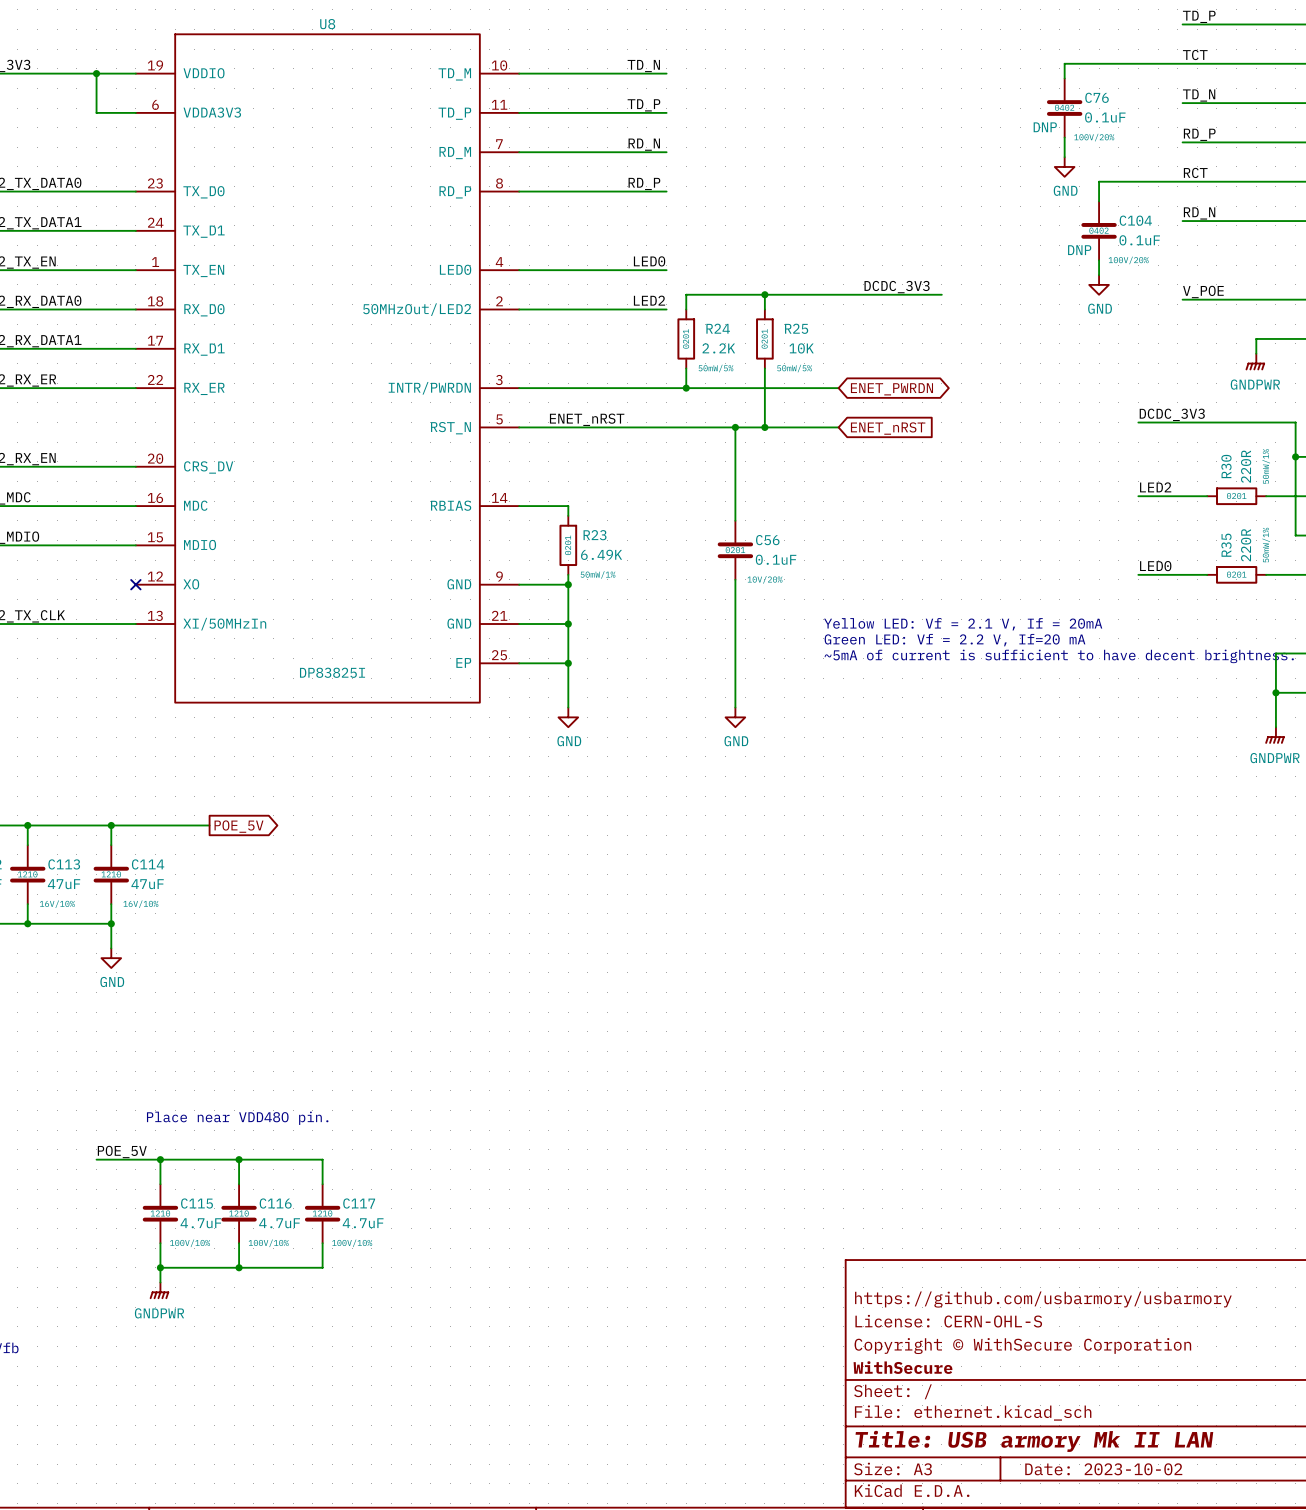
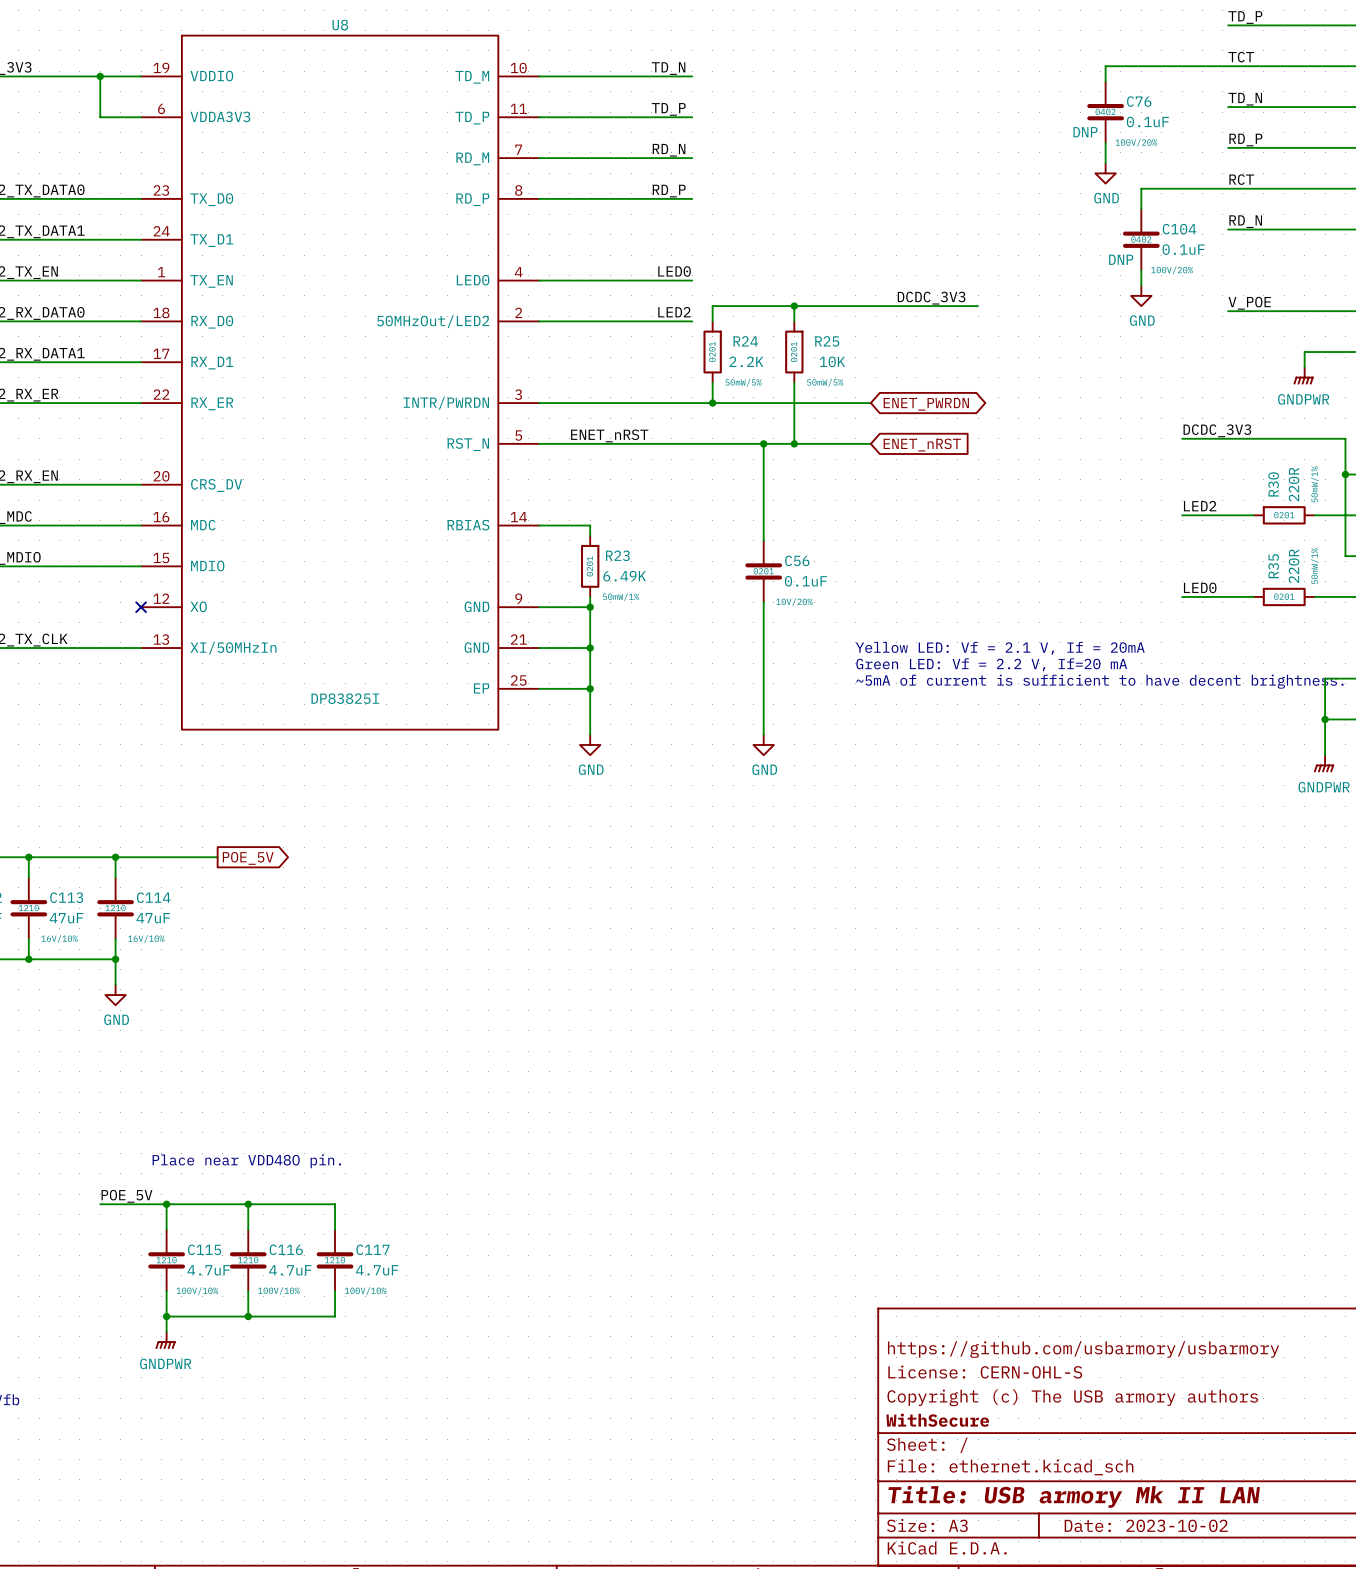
title block: Copyright © WithSecure Corporation (1022, 1346) -> Copyright (c) The USB armory authors (1072, 1397)

